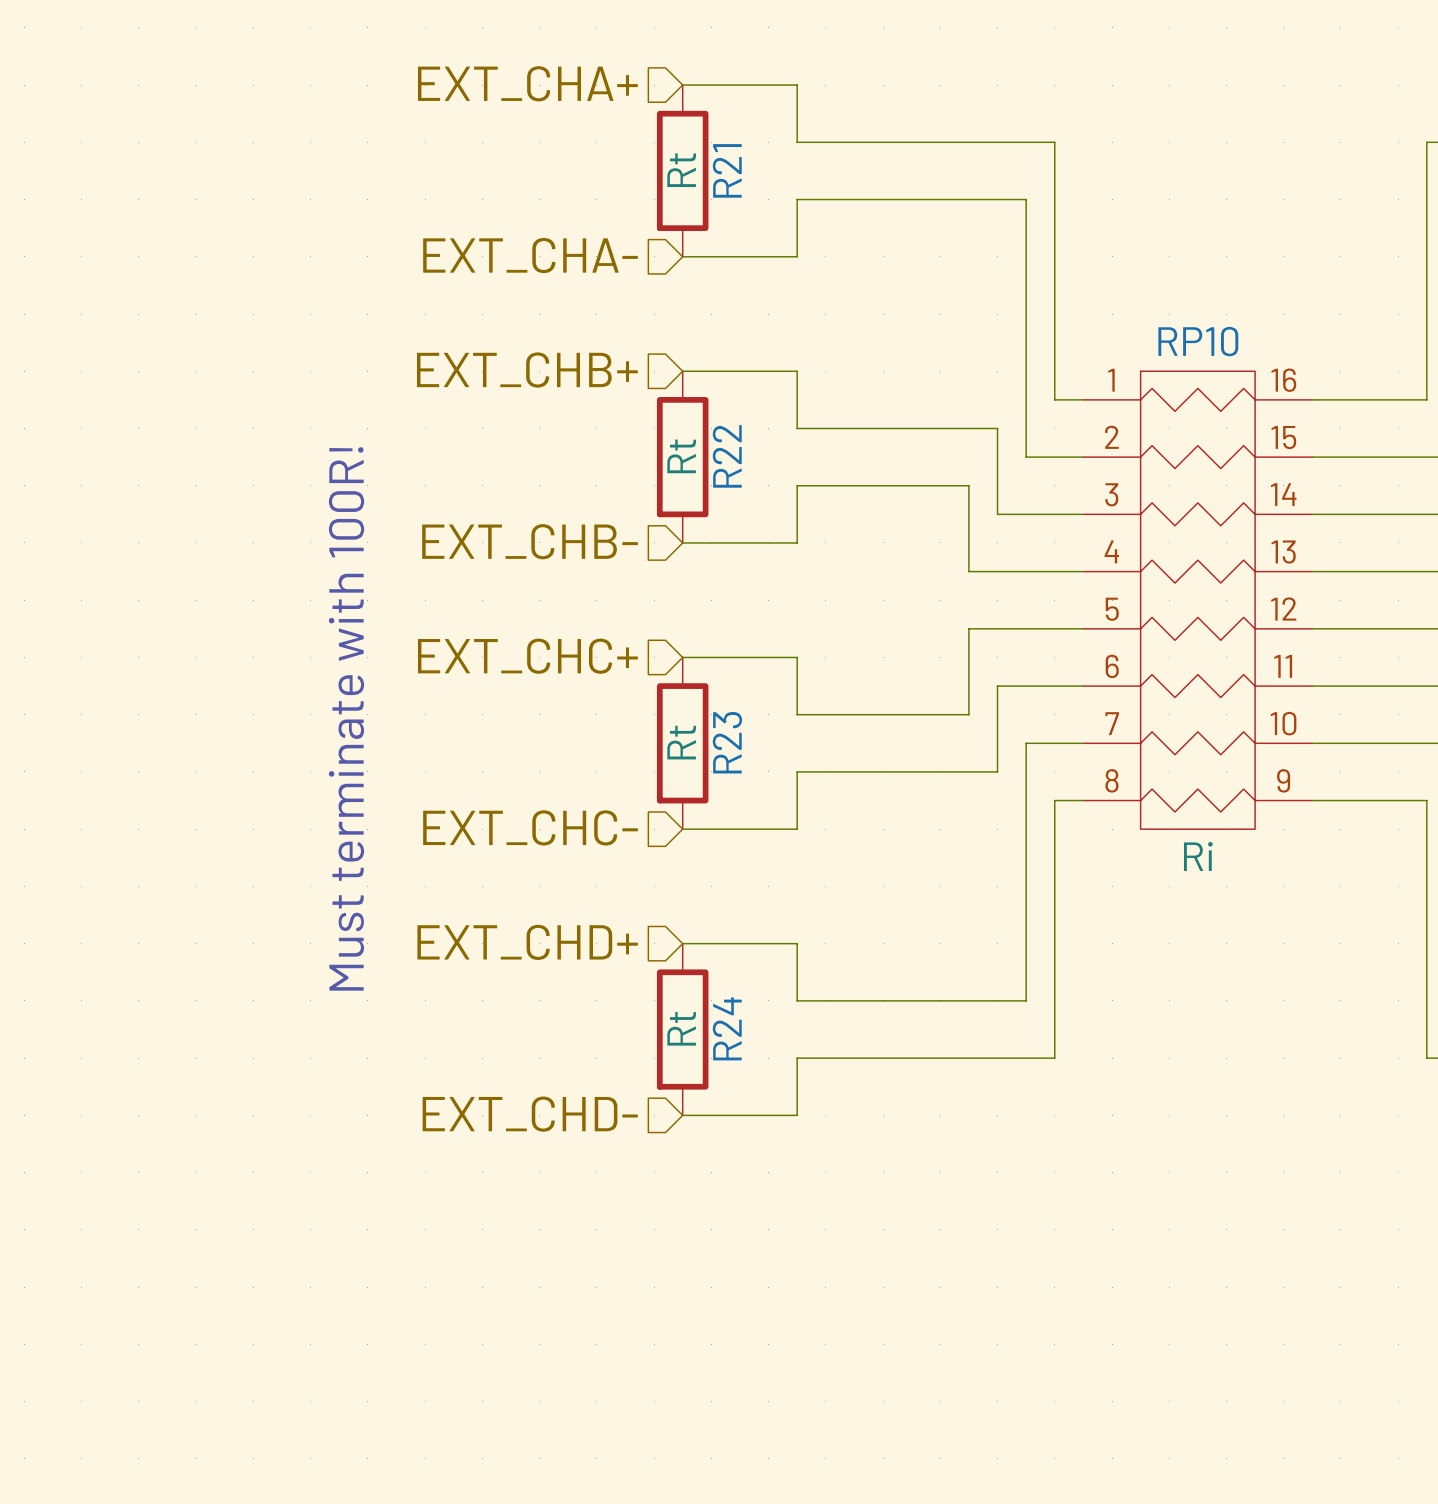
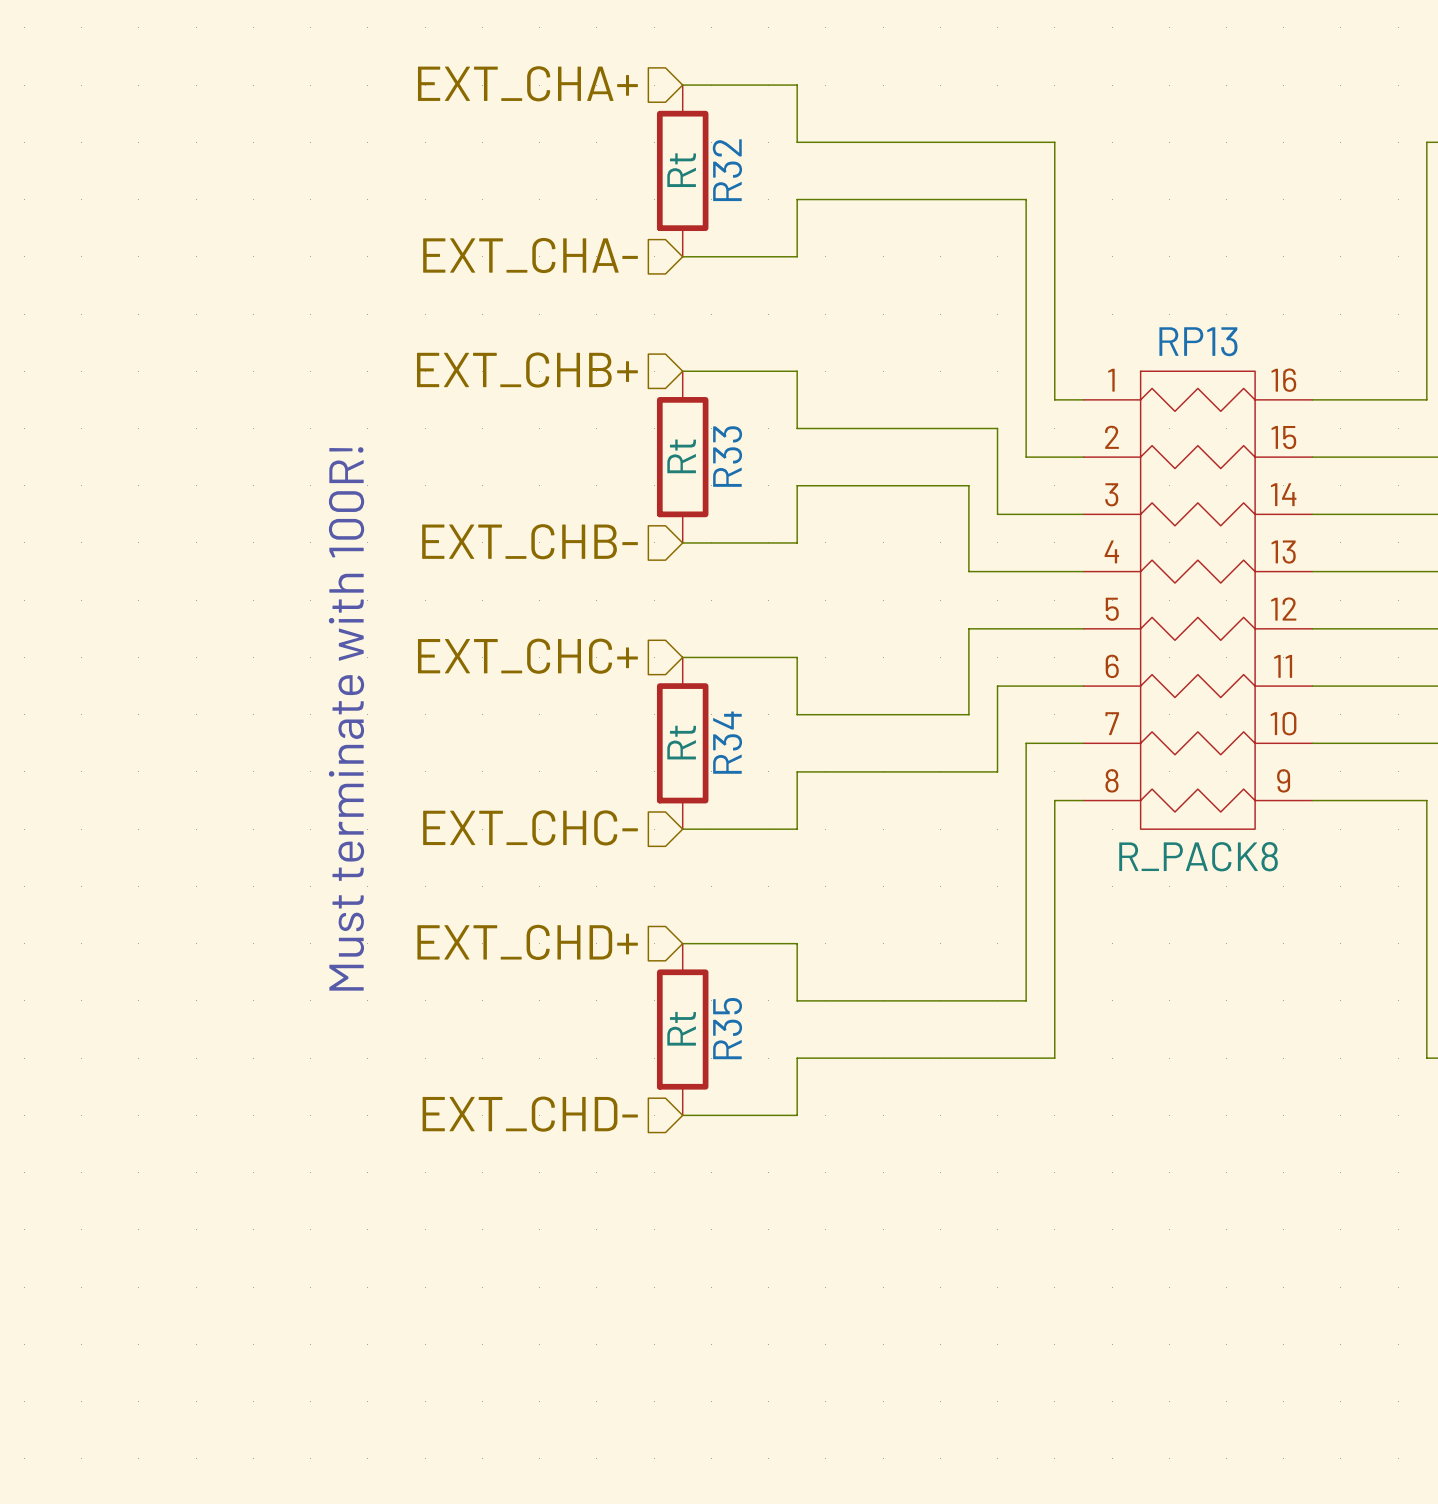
R21 name: R21 (727, 170) -> R32 (727, 170)
RP10 name: RP10 (1198, 341) -> RP13 (1198, 341)
R22 name: R22 (727, 456) -> R33 (727, 456)
R23 name: R23 (727, 742) -> R34 (727, 742)
RP10 value: Ri (1198, 856) -> R_PACK8 (1198, 856)
R24 name: R24 (727, 1028) -> R35 (727, 1028)

